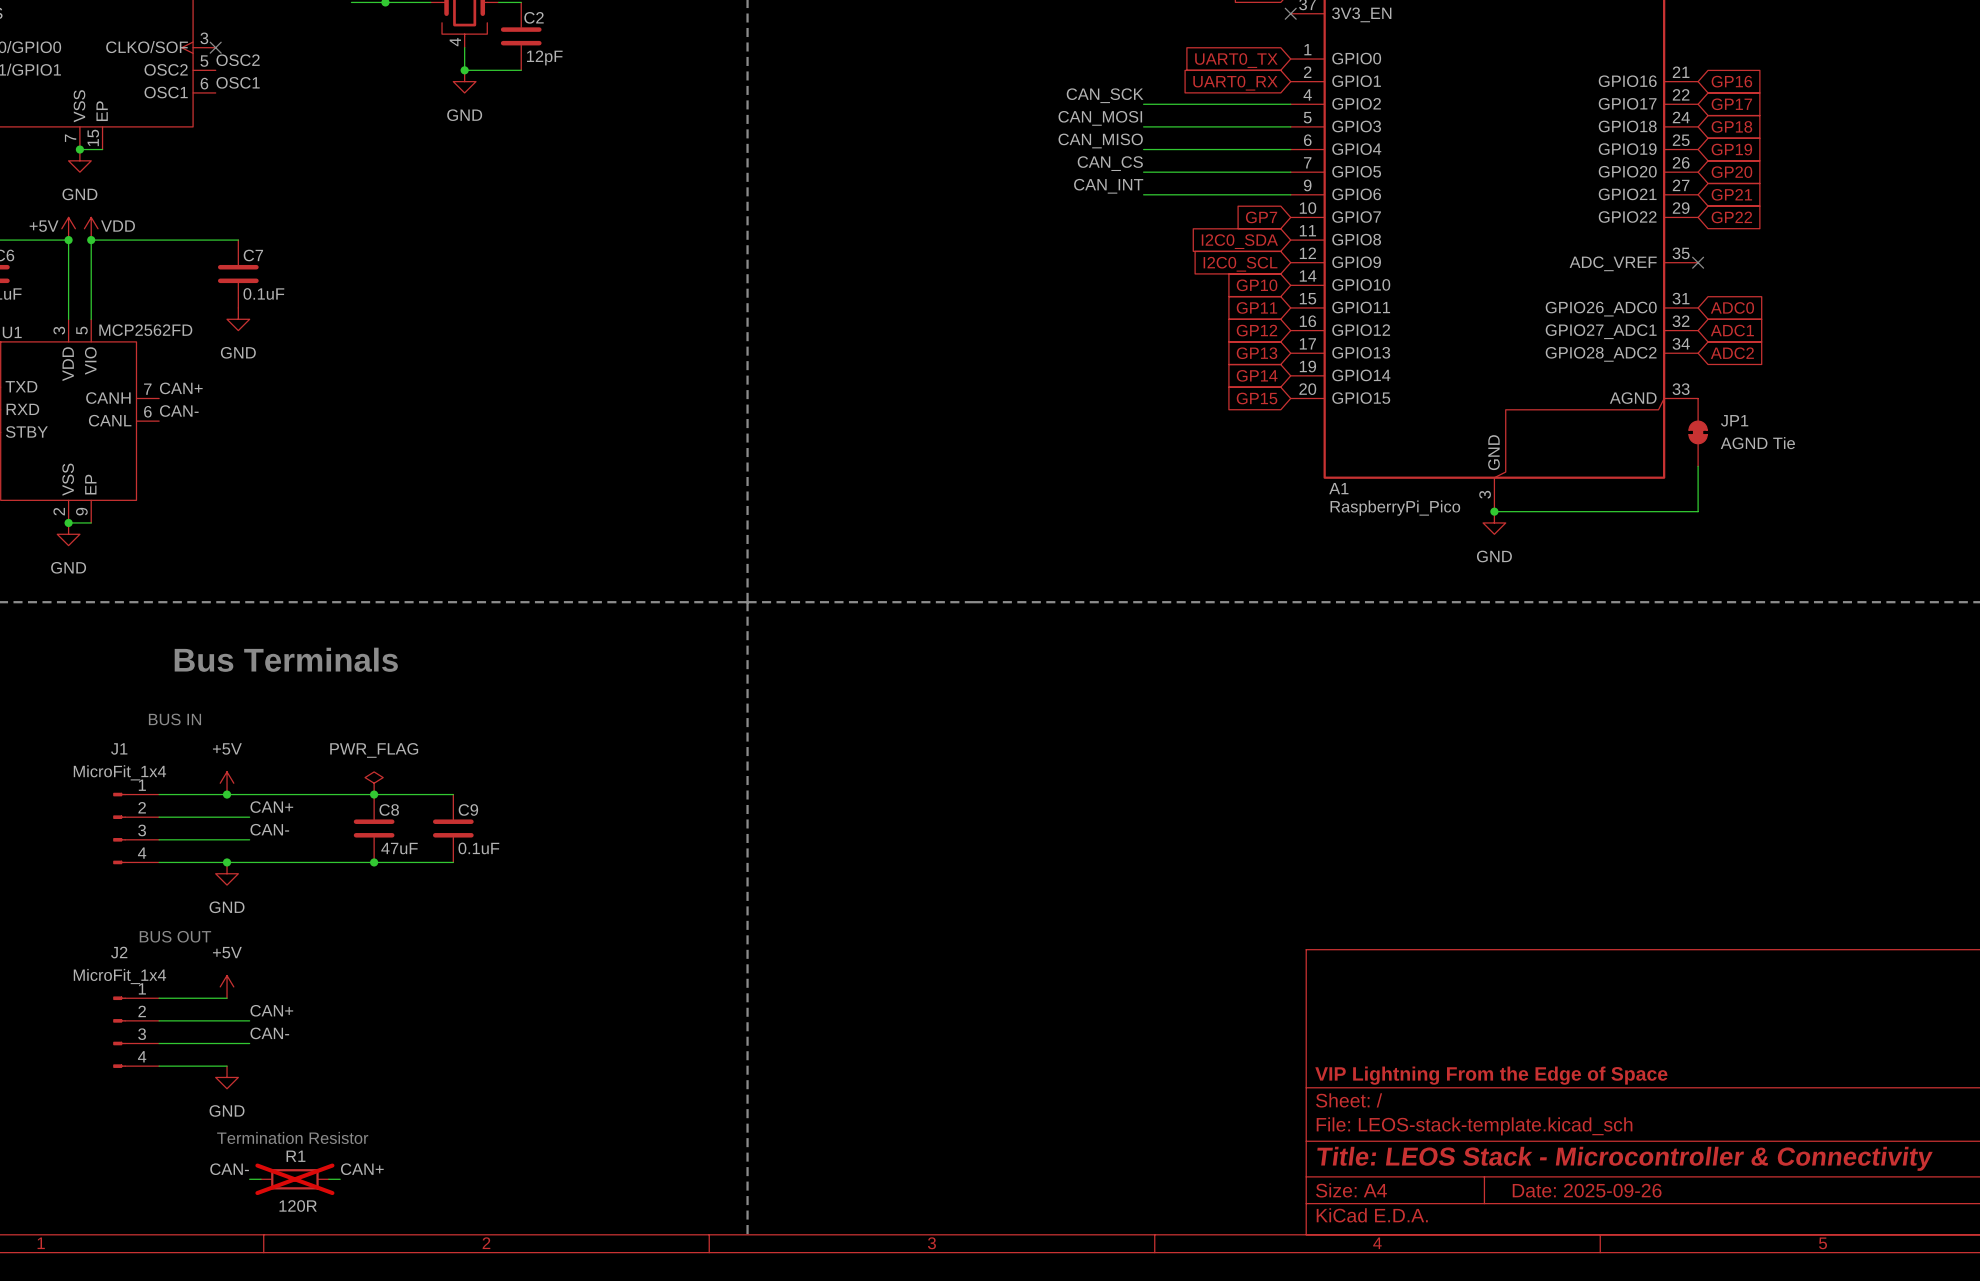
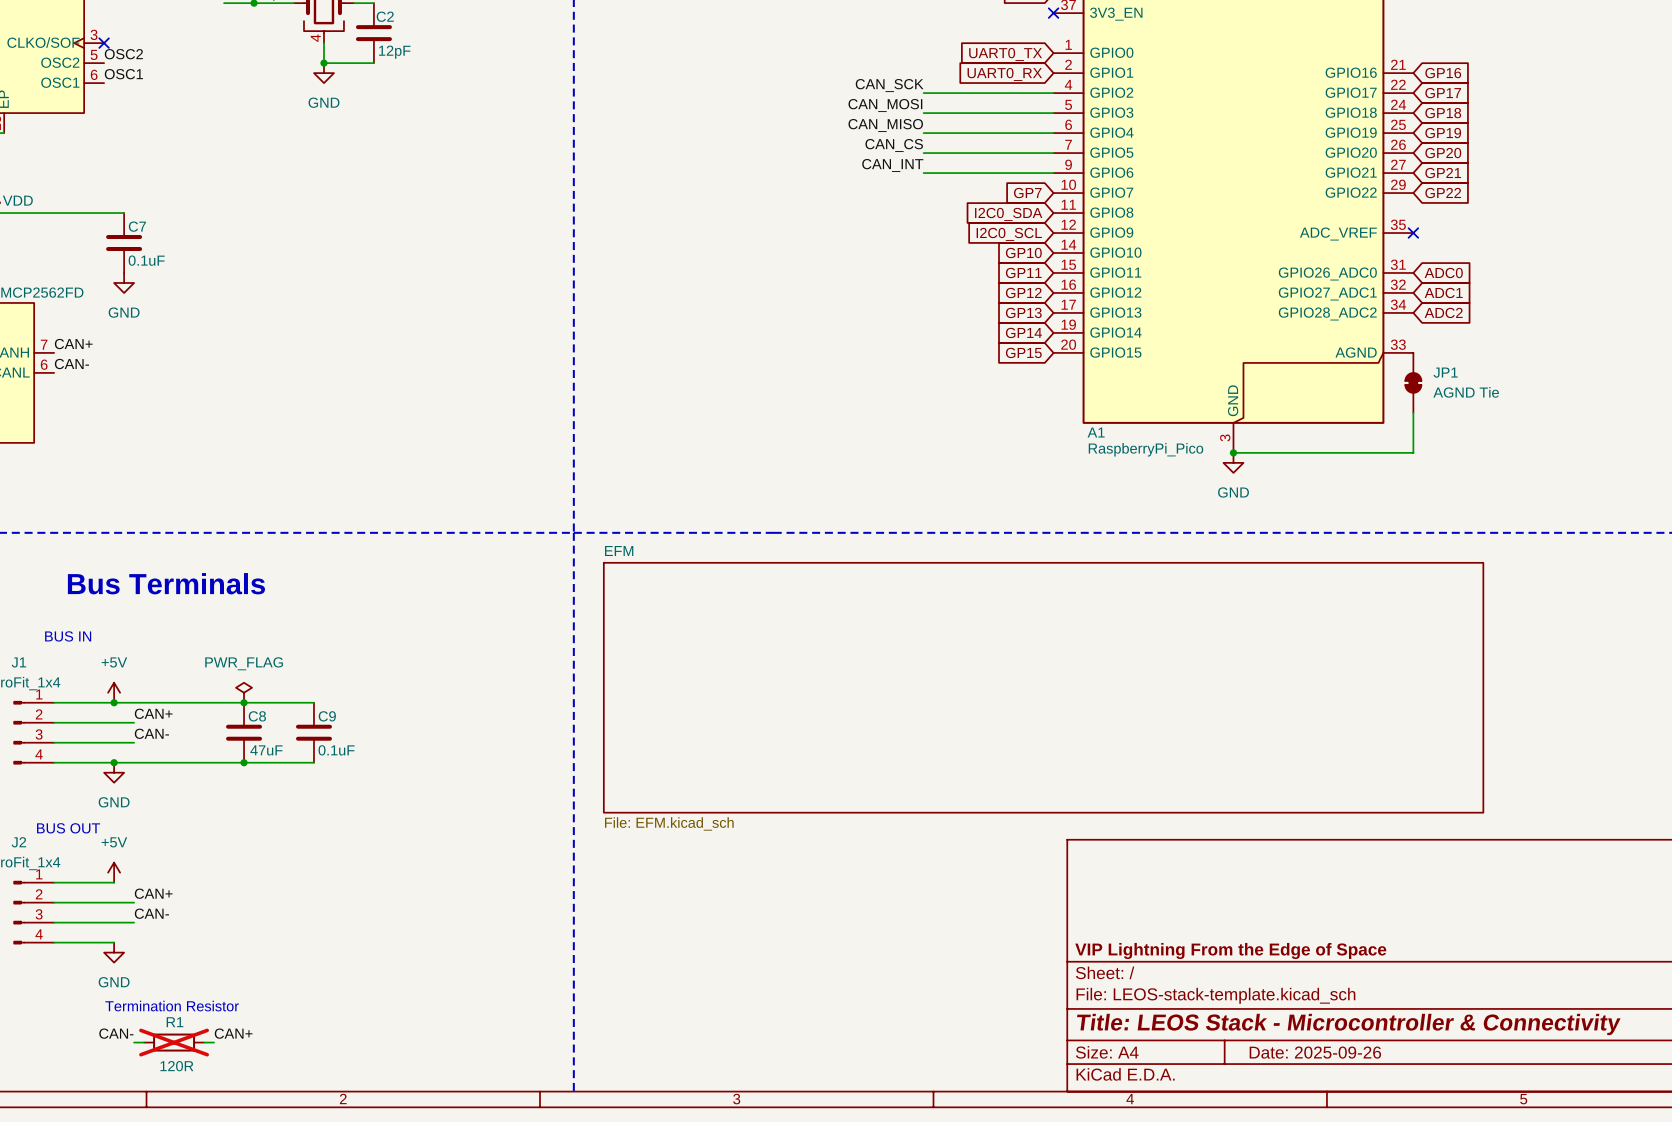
sheet EFM: none -> File: EFM.kicad_sch (1043, 687)

